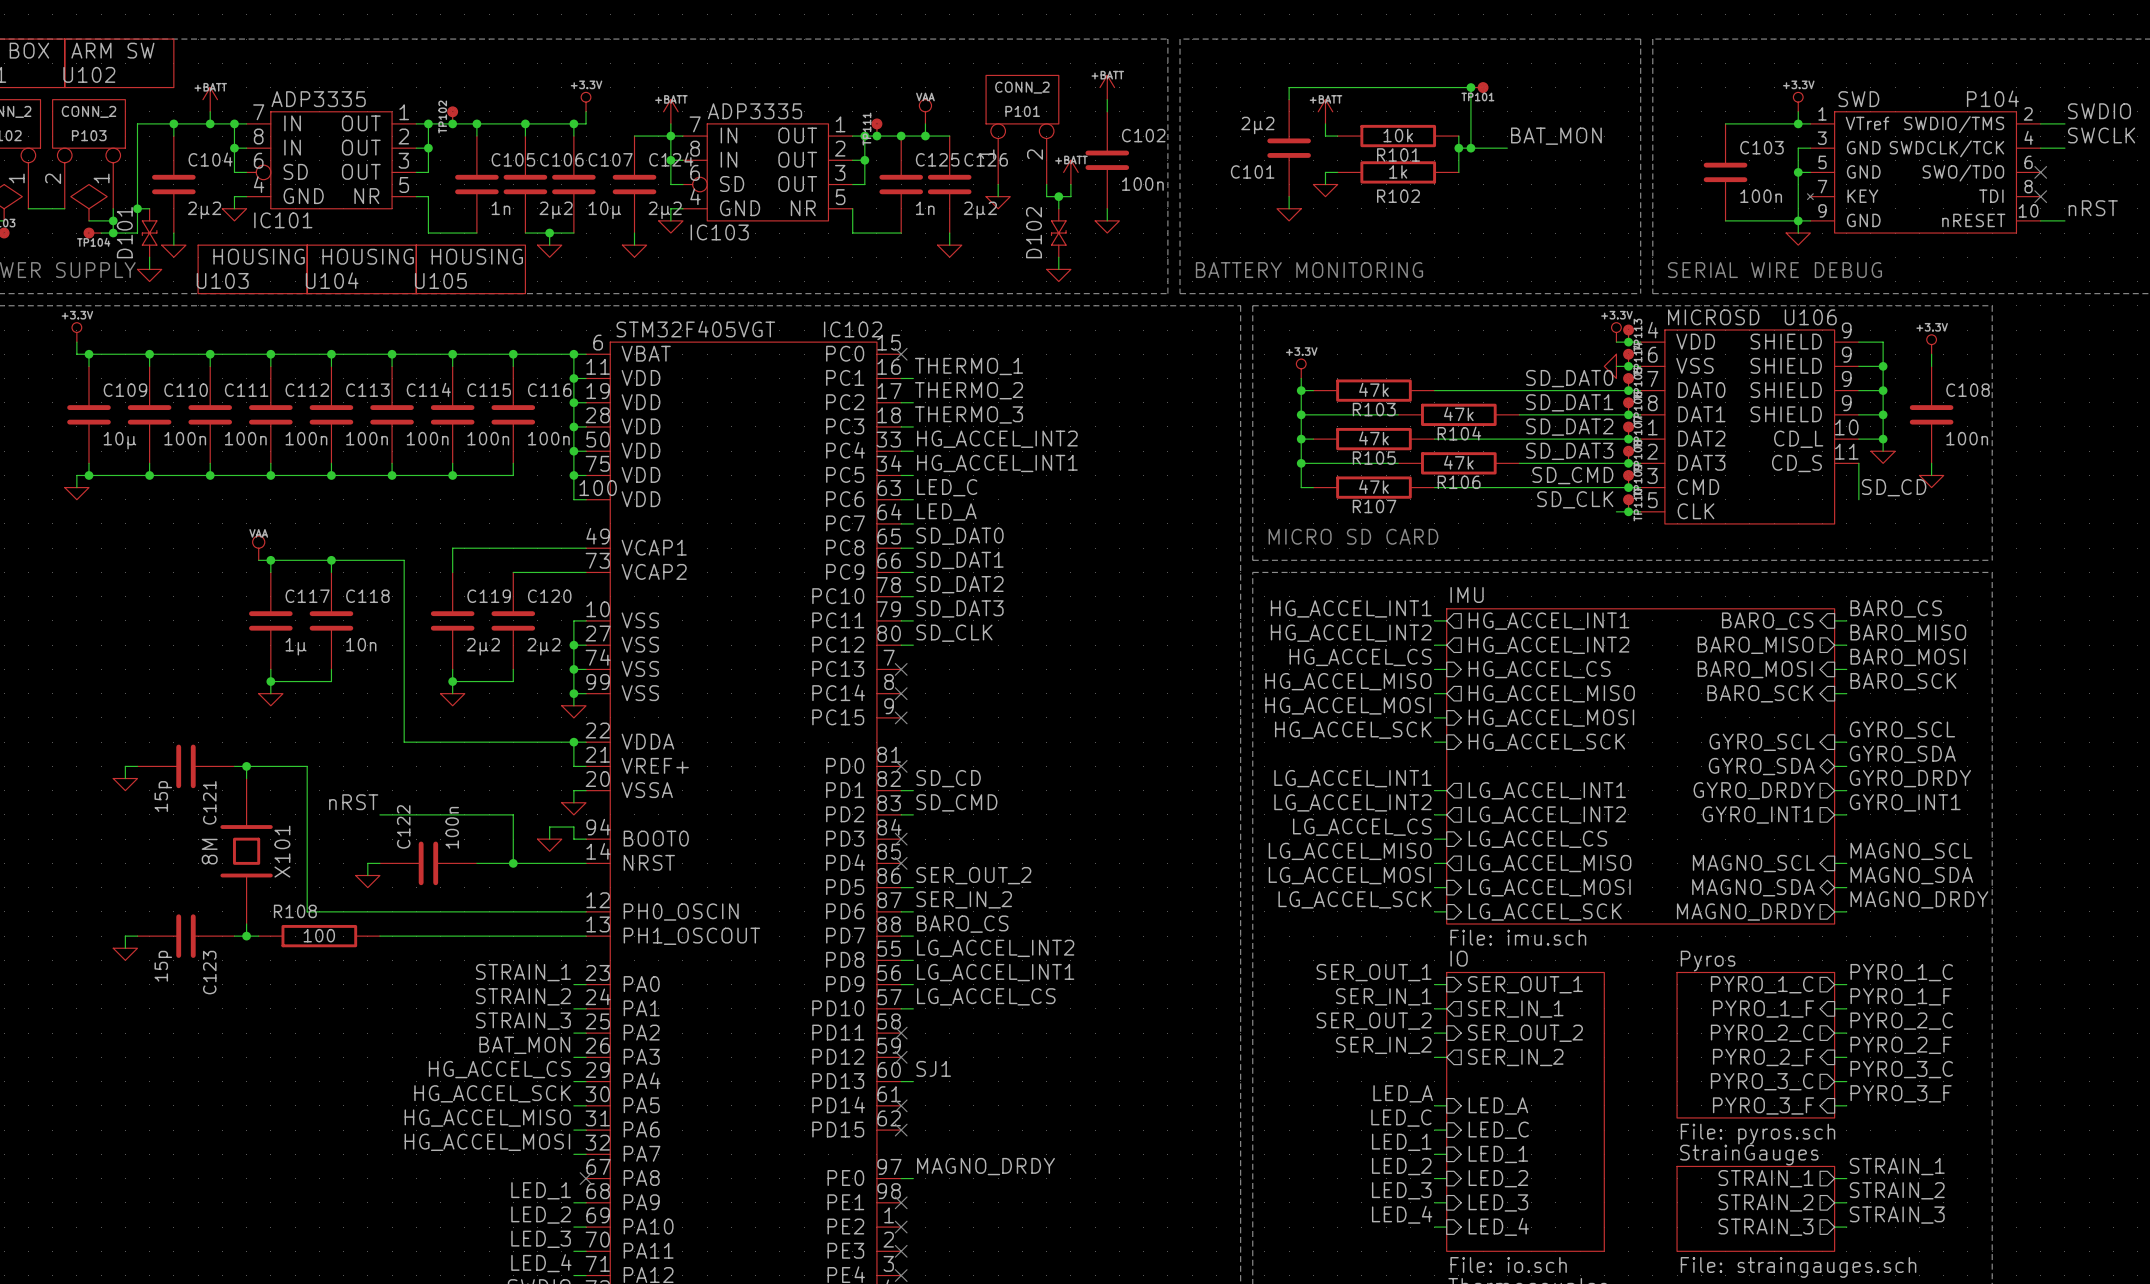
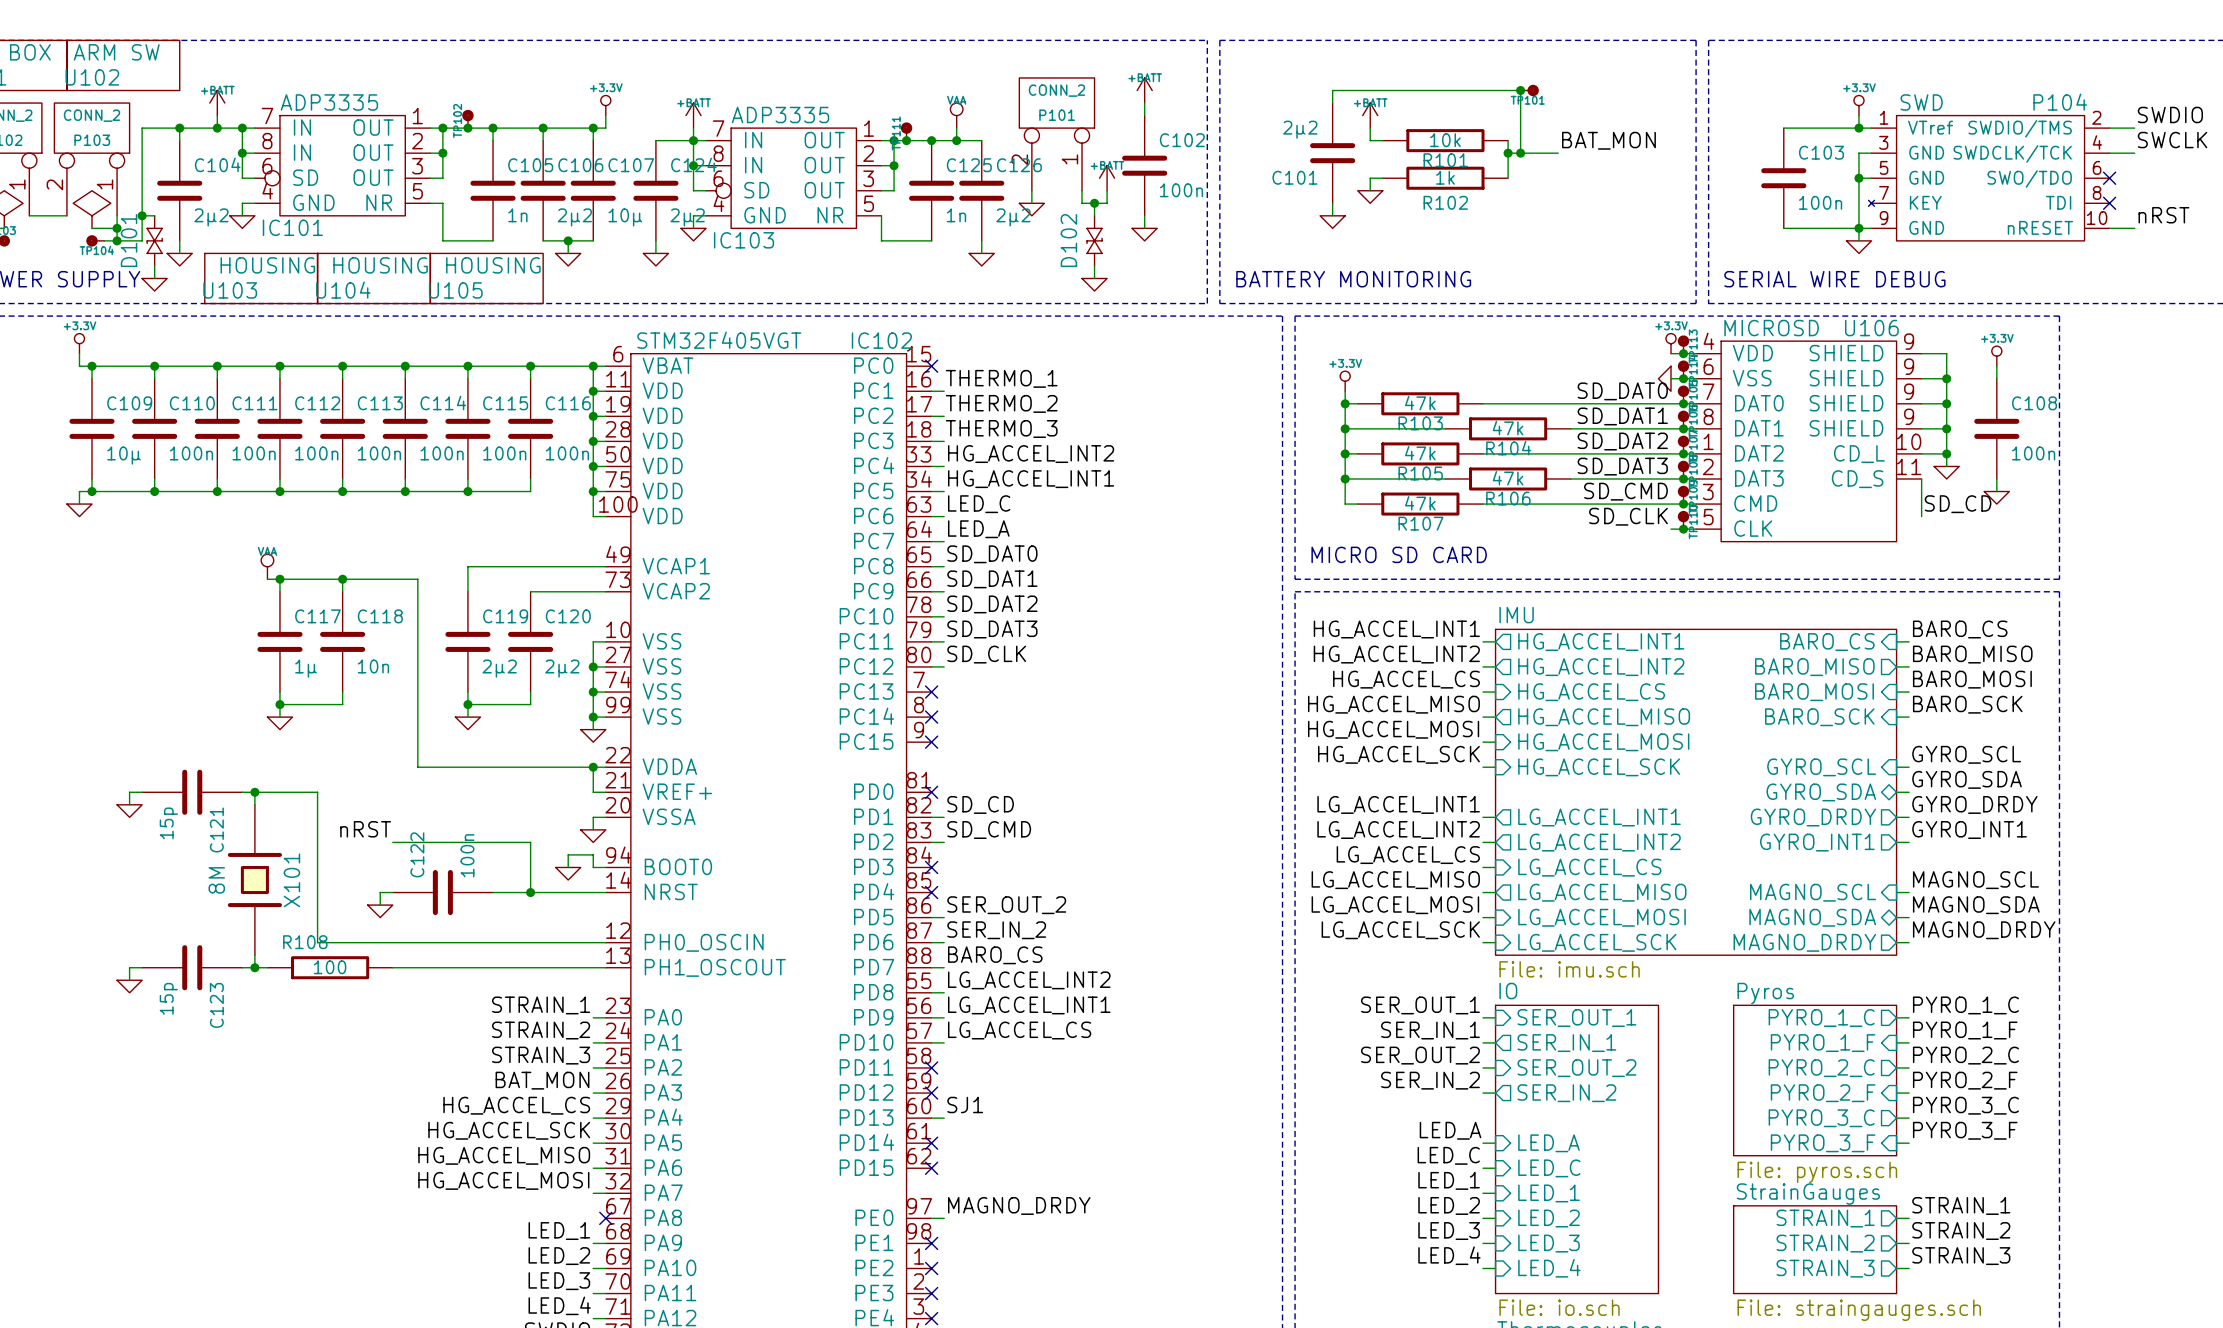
P101 flip: as is (1022, 99) -> left-right (1056, 103)

